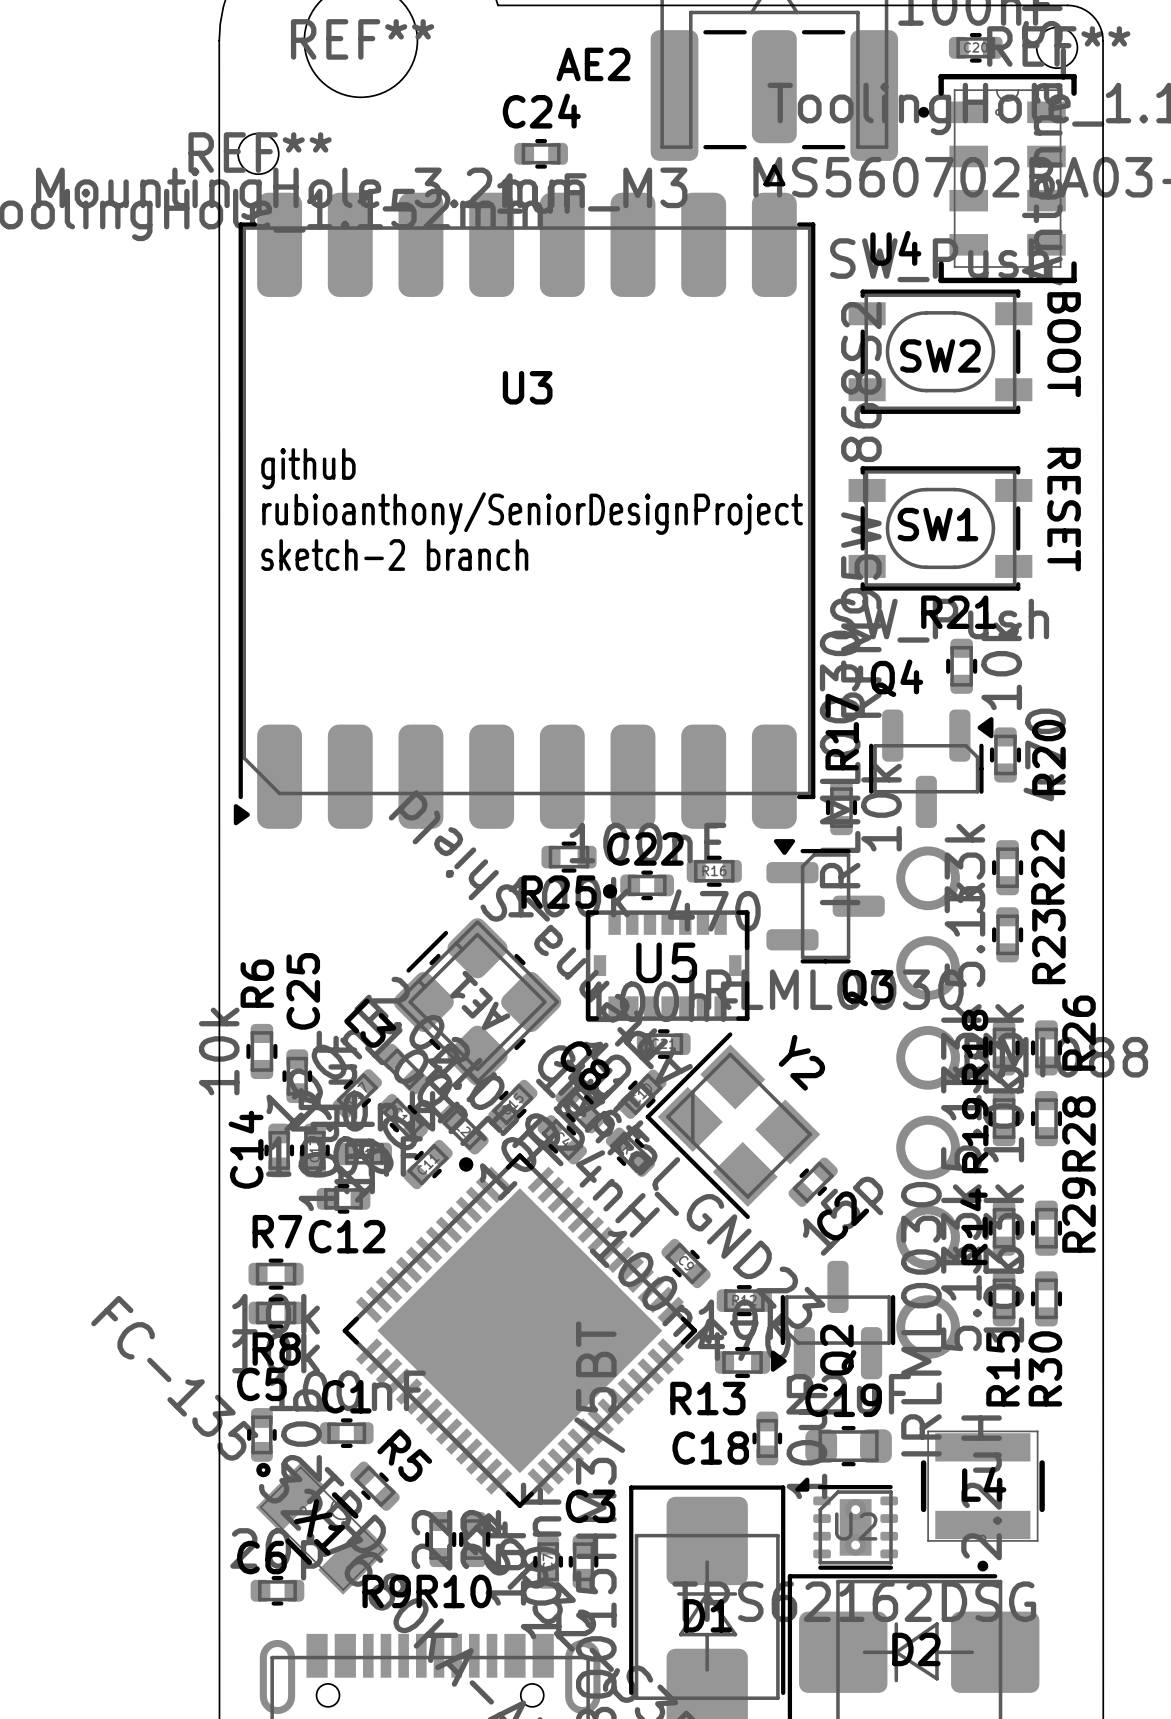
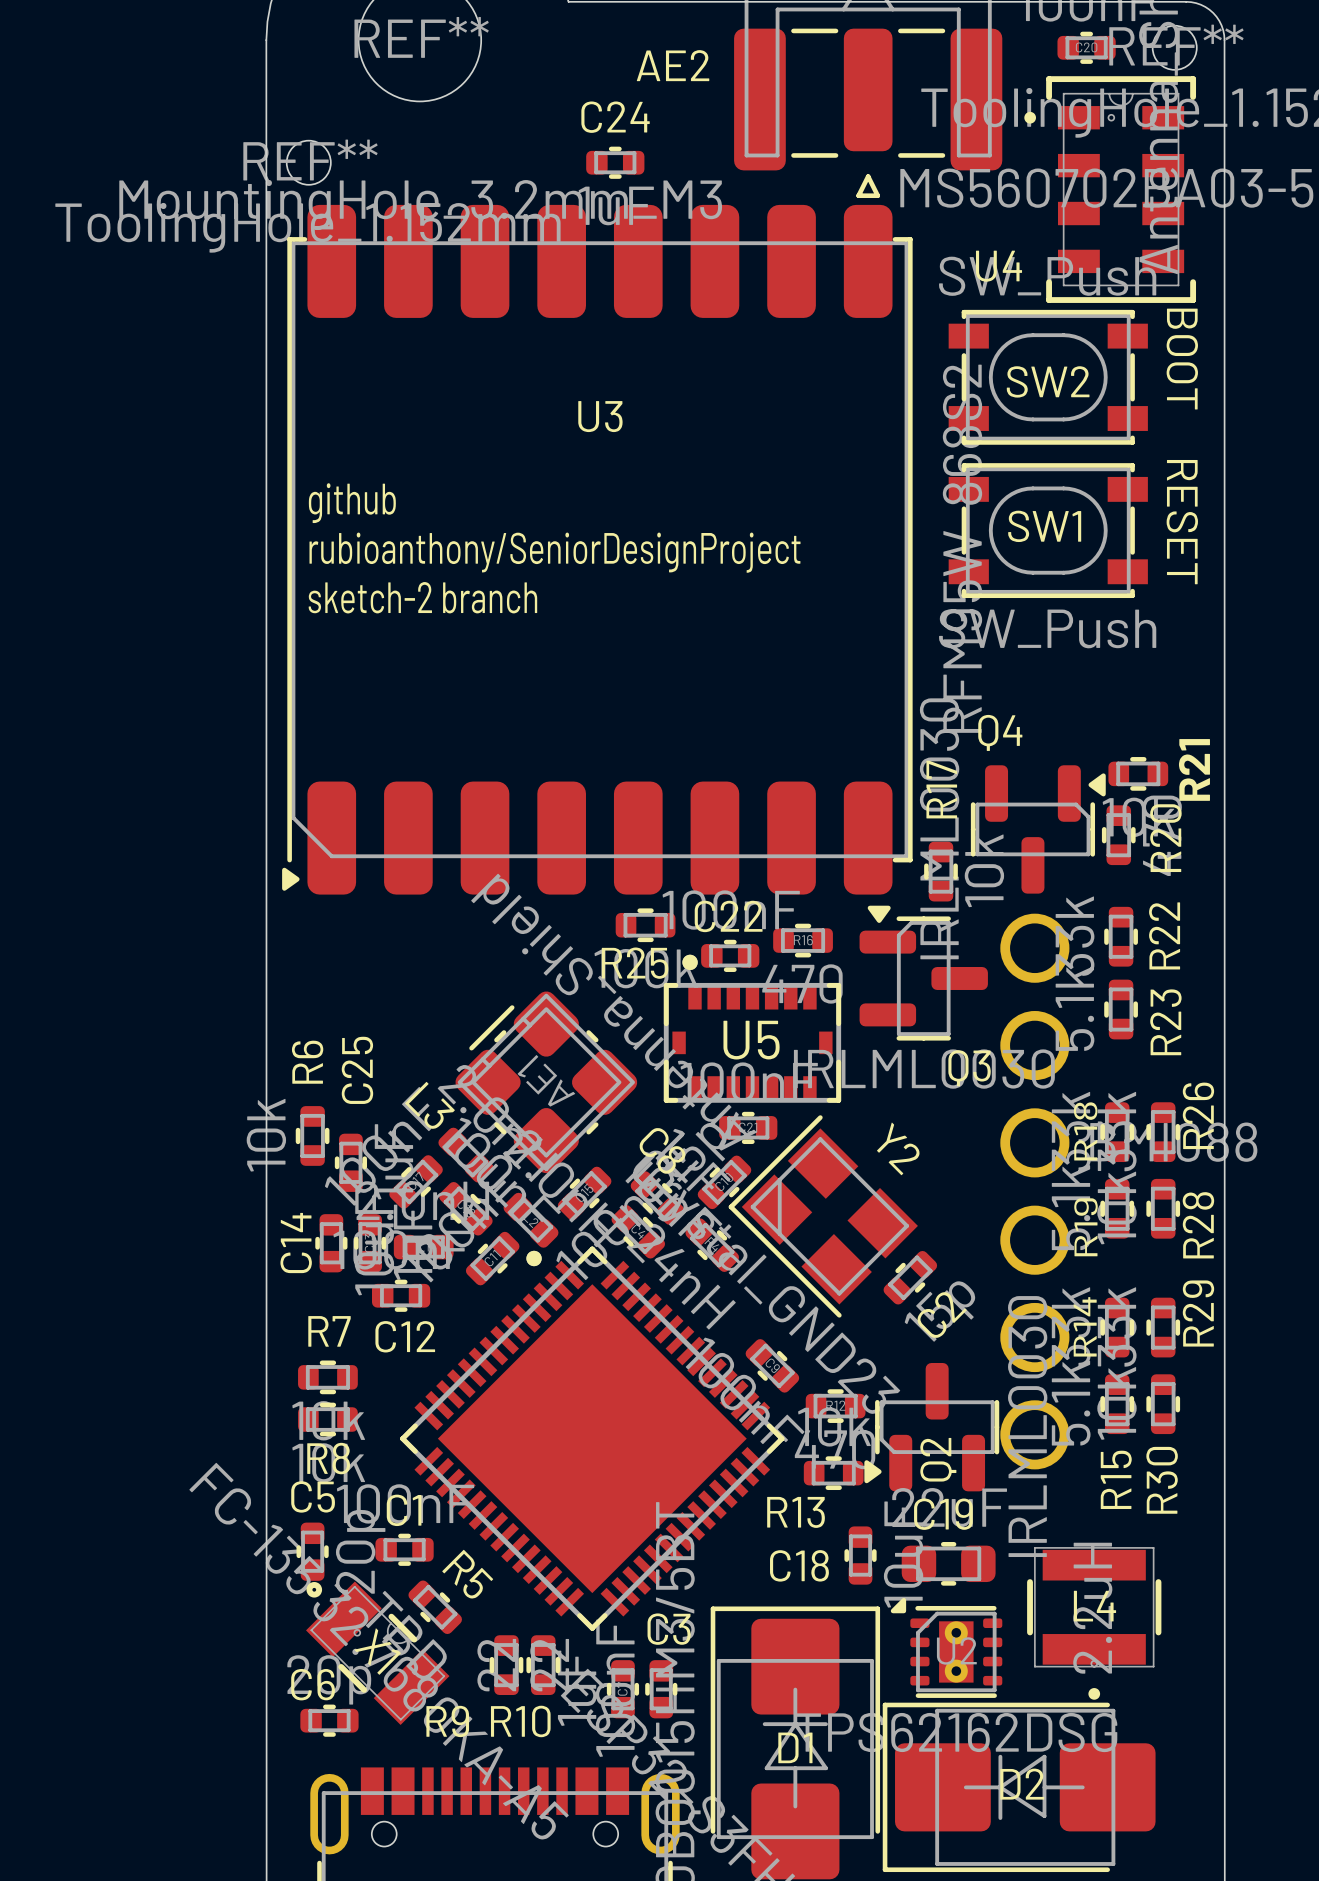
text position: RESET (1064, 509) -> RESET (1182, 522)
SW1 position: (940, 528) -> (1048, 530)
R21 rotation: 0° (961, 666) -> 90° clockwise (1138, 773)
R21 position: (961, 666) -> (1138, 773)
R20 position: (1005, 754) -> (1118, 835)

